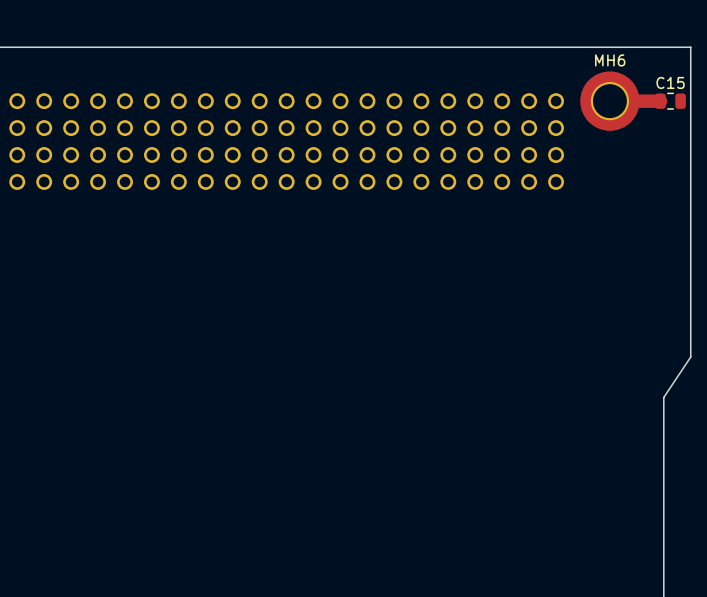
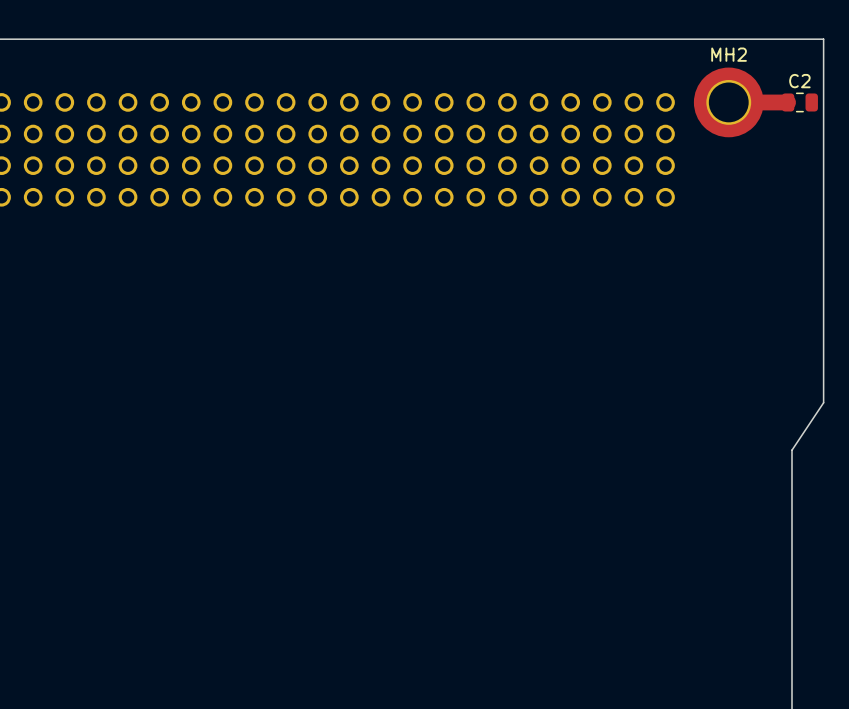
MH6 name: MH6 (610, 60) -> MH2 (729, 54)
C15 name: C15 (670, 82) -> C2 (799, 81)

